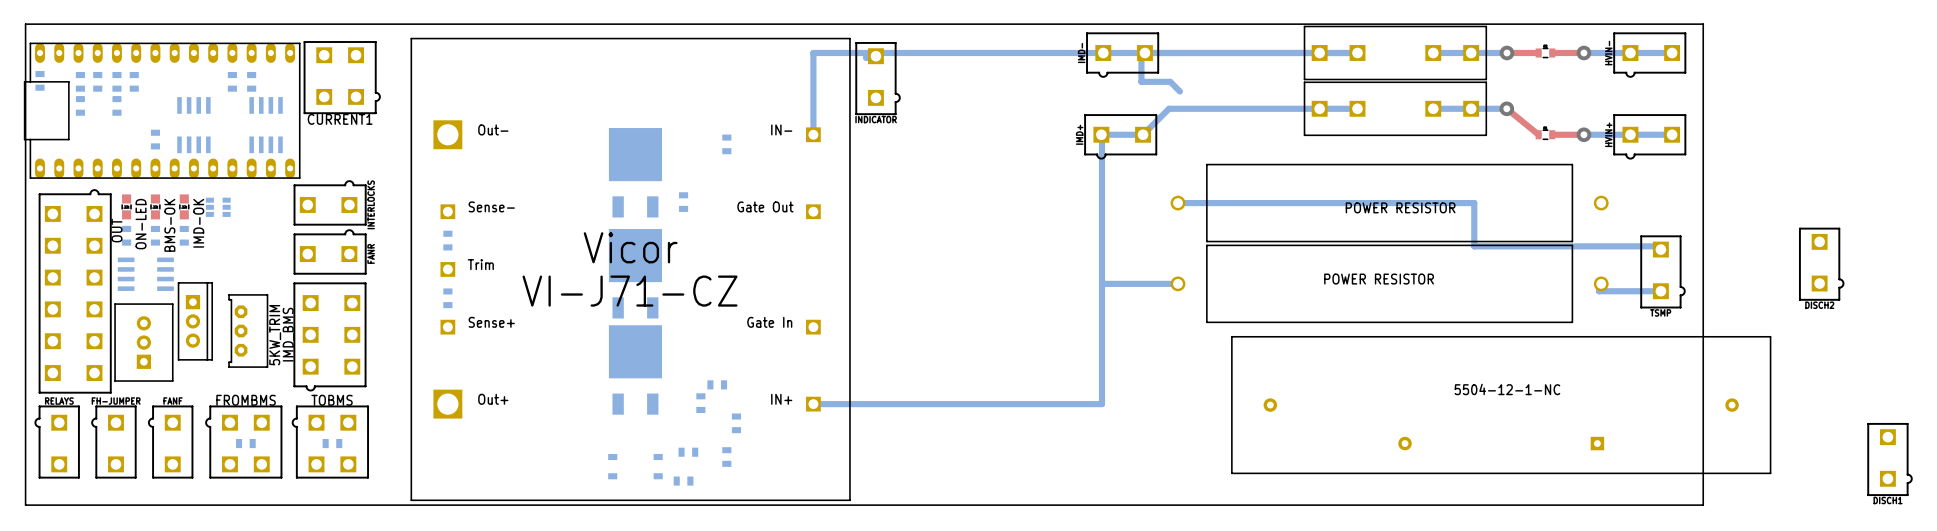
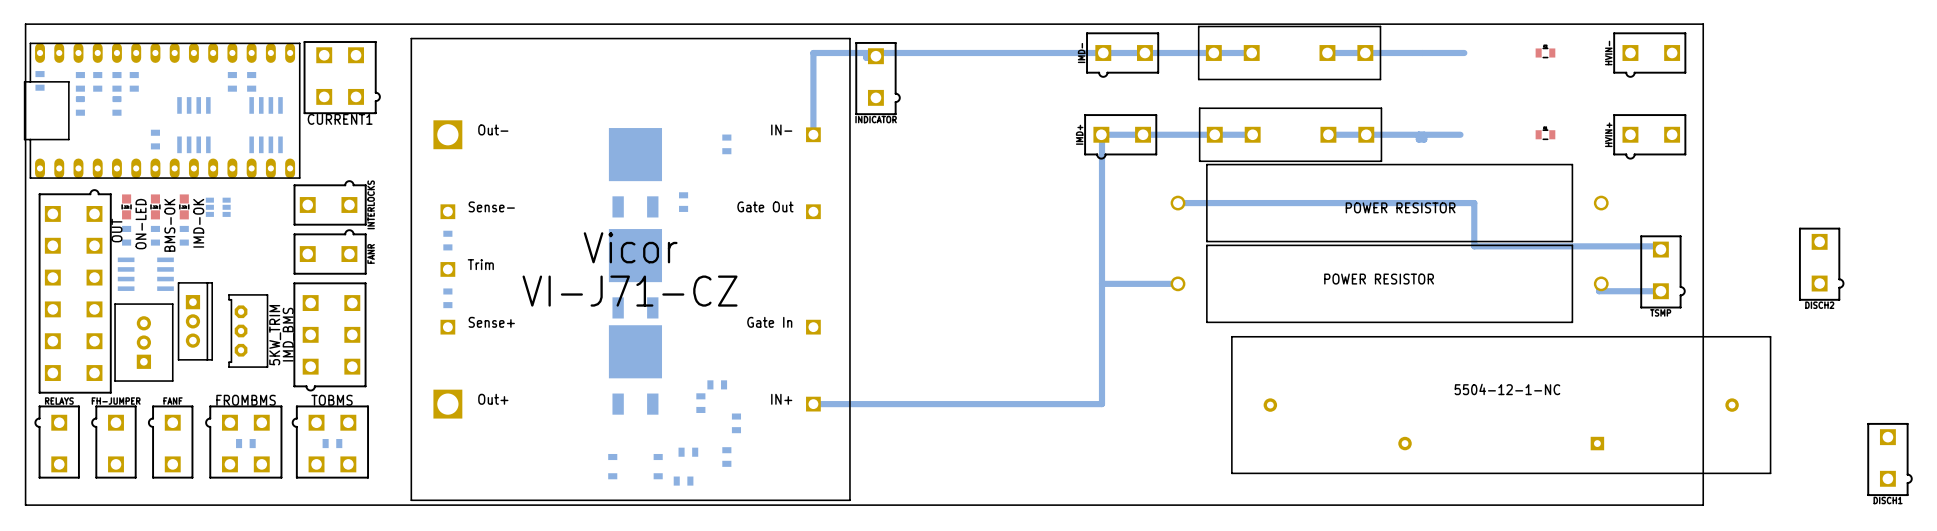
bottom track: (1141, 52) (1141, 81) (1170, 81) (1179, 91) -> none
bottom track: (1251, 52) (1327, 52) -> (1357, 52) (1433, 52)
part: none -> (1289, 52)
part: (1395, 52) -> none
bottom track: (1464, 52) (1506, 52) -> none
top track: (1506, 52) (1538, 52) -> none
via: (1506, 52) -> none
top track: (1552, 52) (1583, 52) -> none
bottom track: (1583, 52) (1672, 52) -> none
via: (1583, 52) -> none
bottom track: (1357, 108) (1169, 108) (1143, 134) -> (1252, 134) (1143, 134)
part: (1395, 108) -> none
bottom track: (1433, 108) (1506, 108) -> none
top track: (1506, 108) (1538, 134) -> none
via: (1506, 108) -> none
part: none -> (1290, 134)
bottom track: none -> (1328, 134) (1460, 134)
bottom track: none -> (1418, 134) (1418, 139) (1424, 139) (1424, 134)
top track: (1552, 134) (1583, 134) -> none
bottom track: (1583, 134) (1672, 134) -> none
via: (1583, 134) -> none

